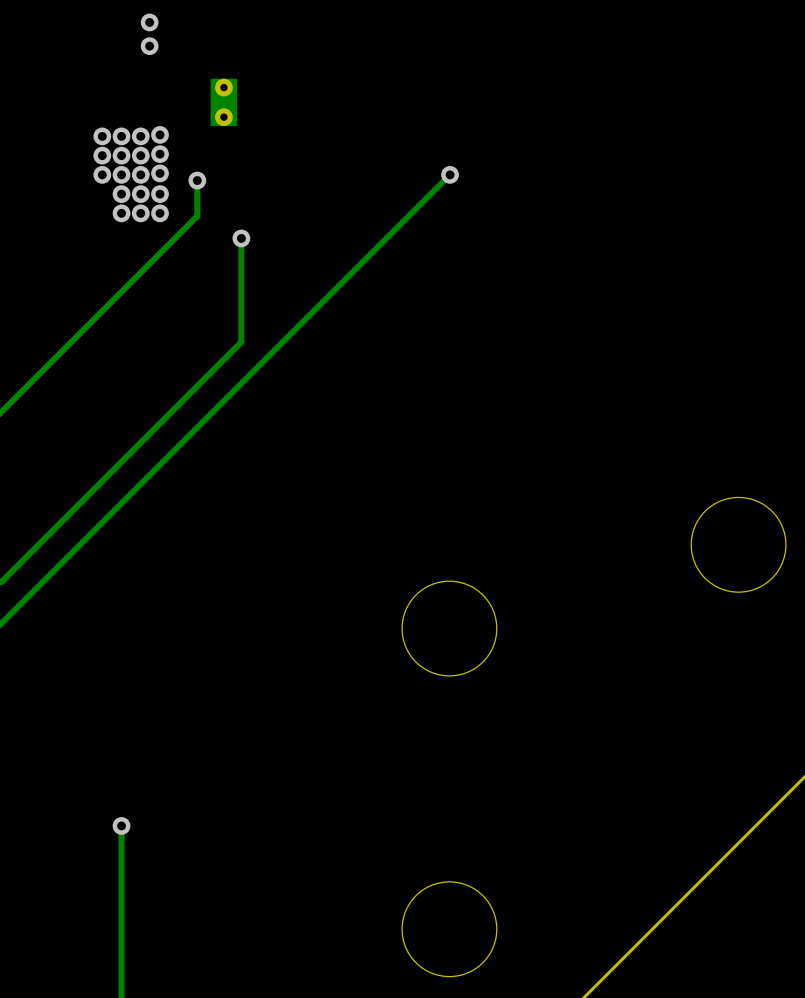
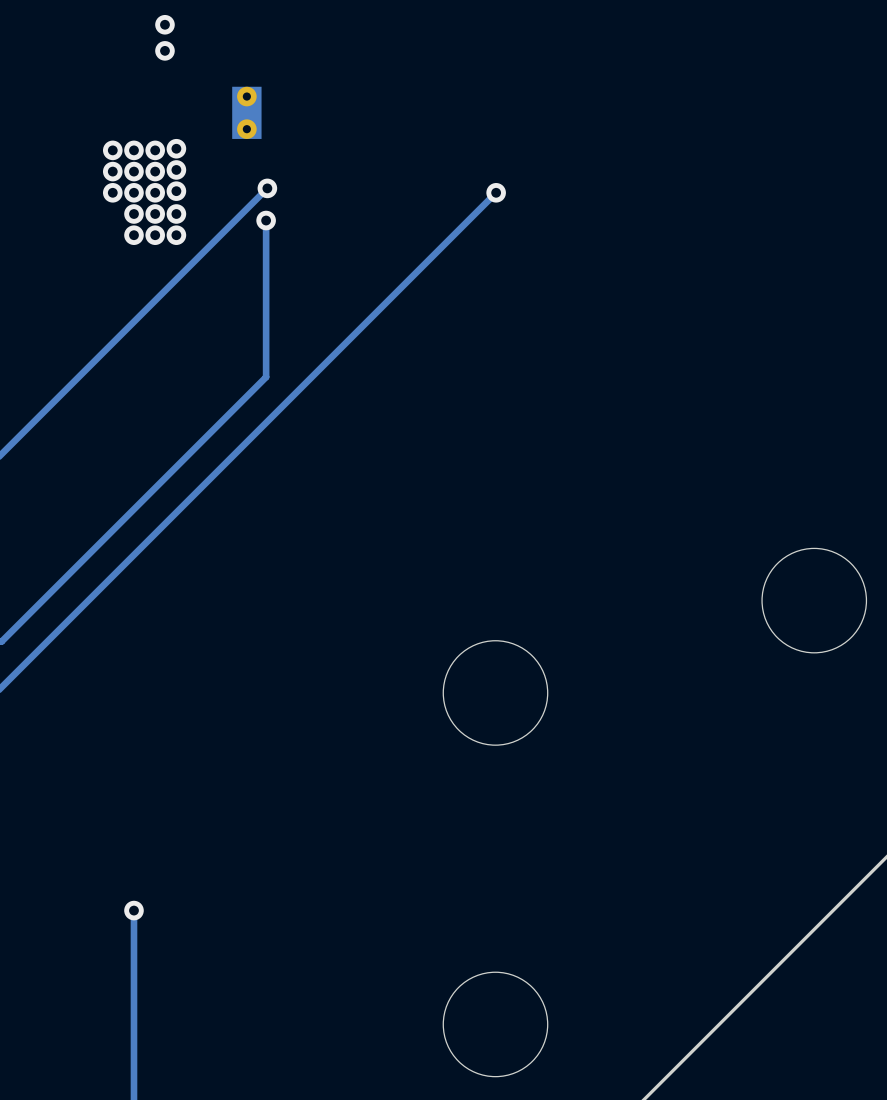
via: none -> (267, 188)
track: (197, 180) (197, 216) -> (267, 188) (217, 238)
via: (197, 180) -> none
track: none -> (266, 220) (266, 262)
via: none -> (266, 220)
via: (241, 238) -> none

